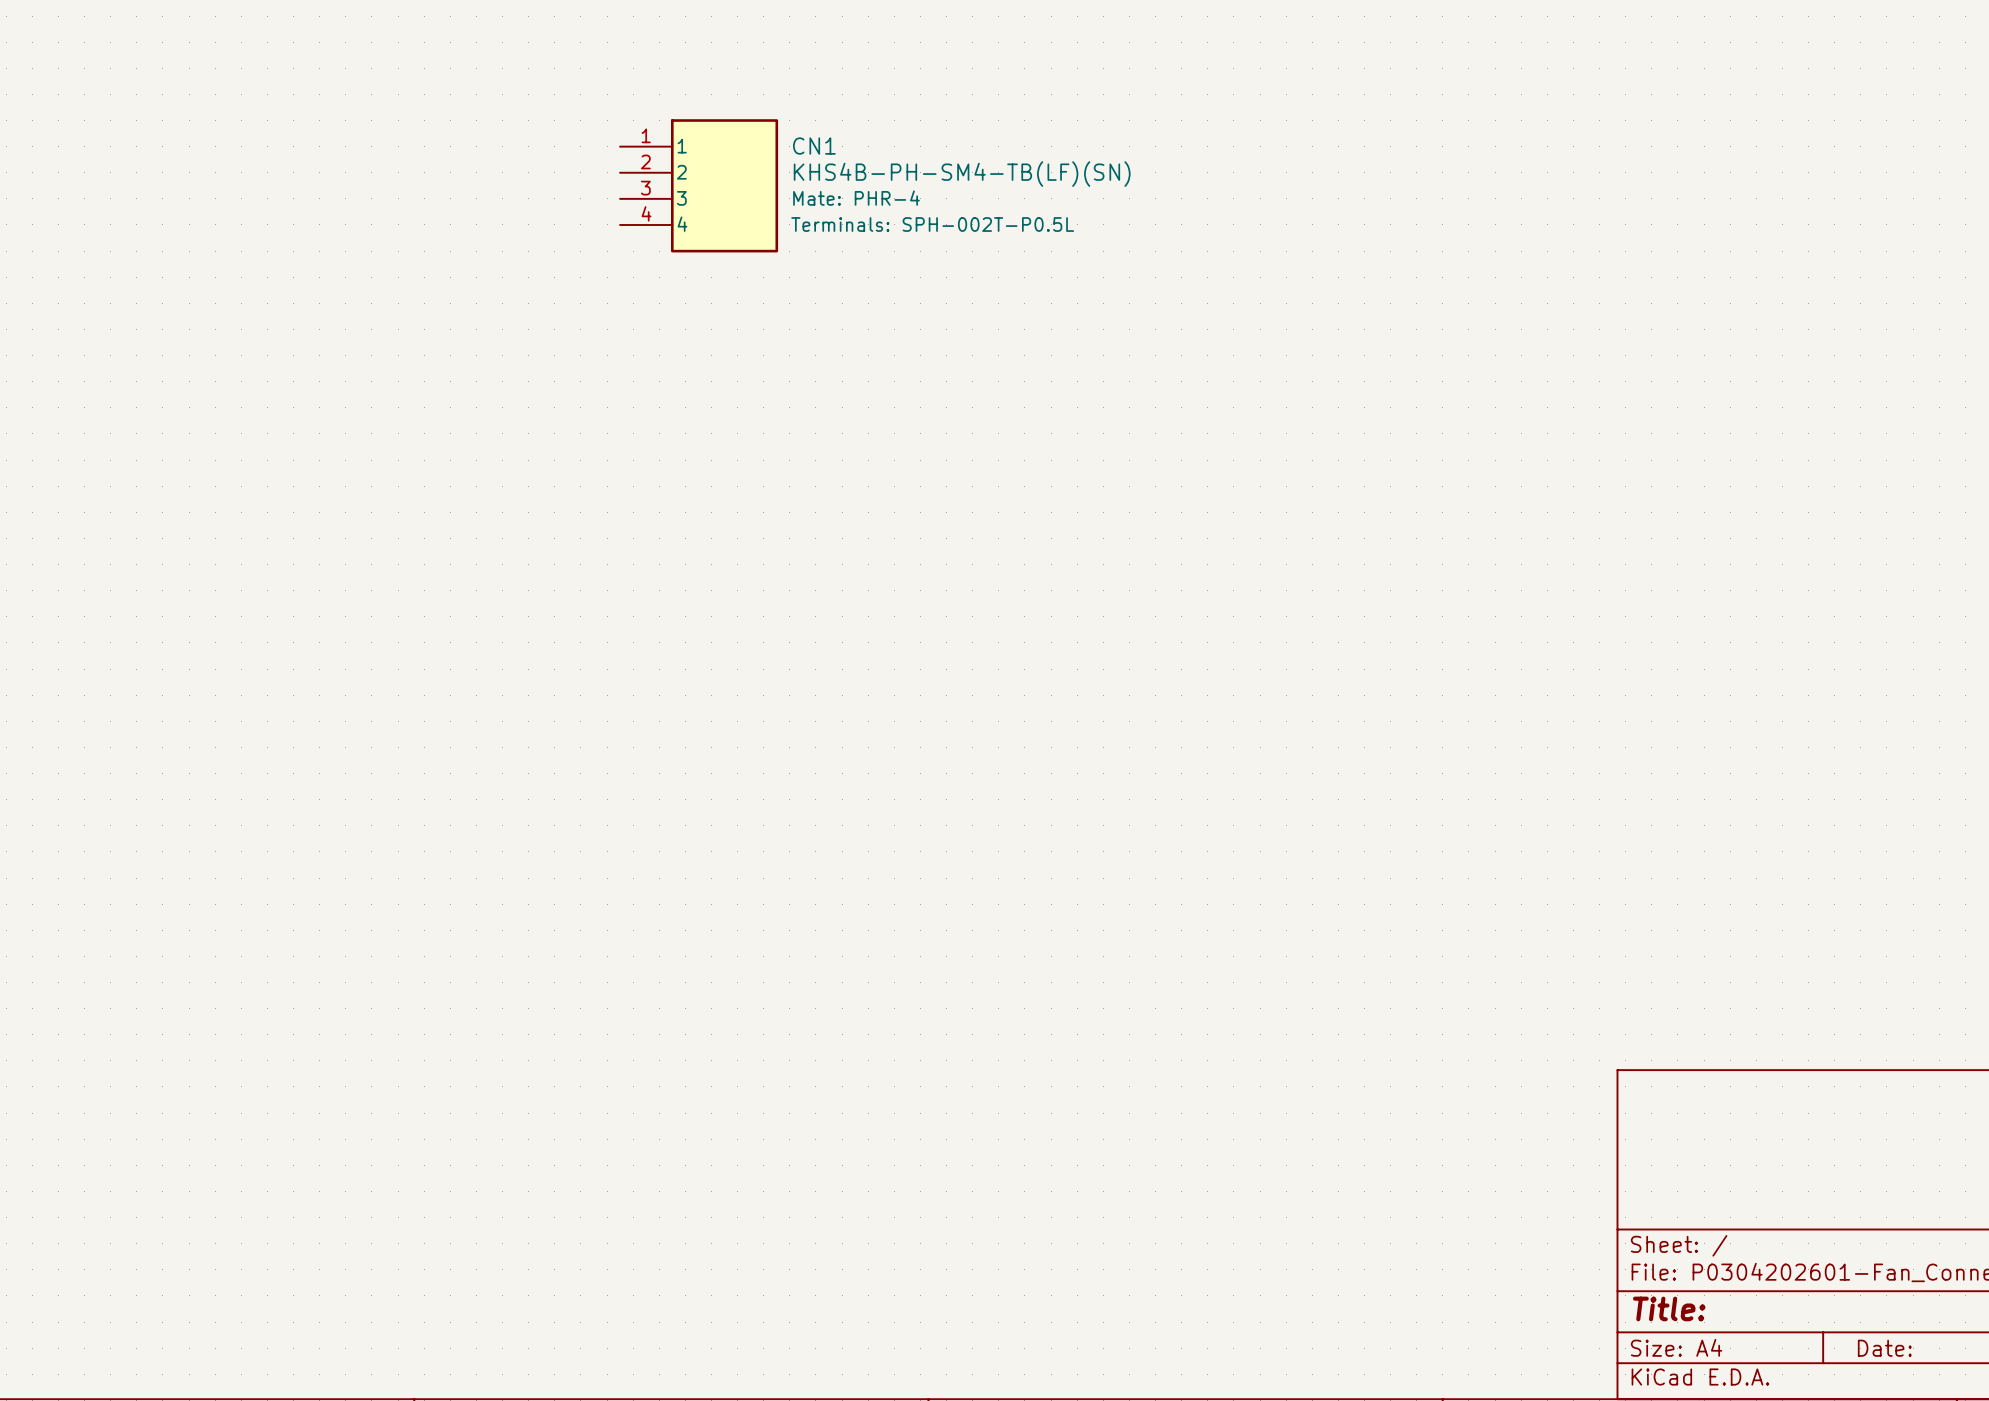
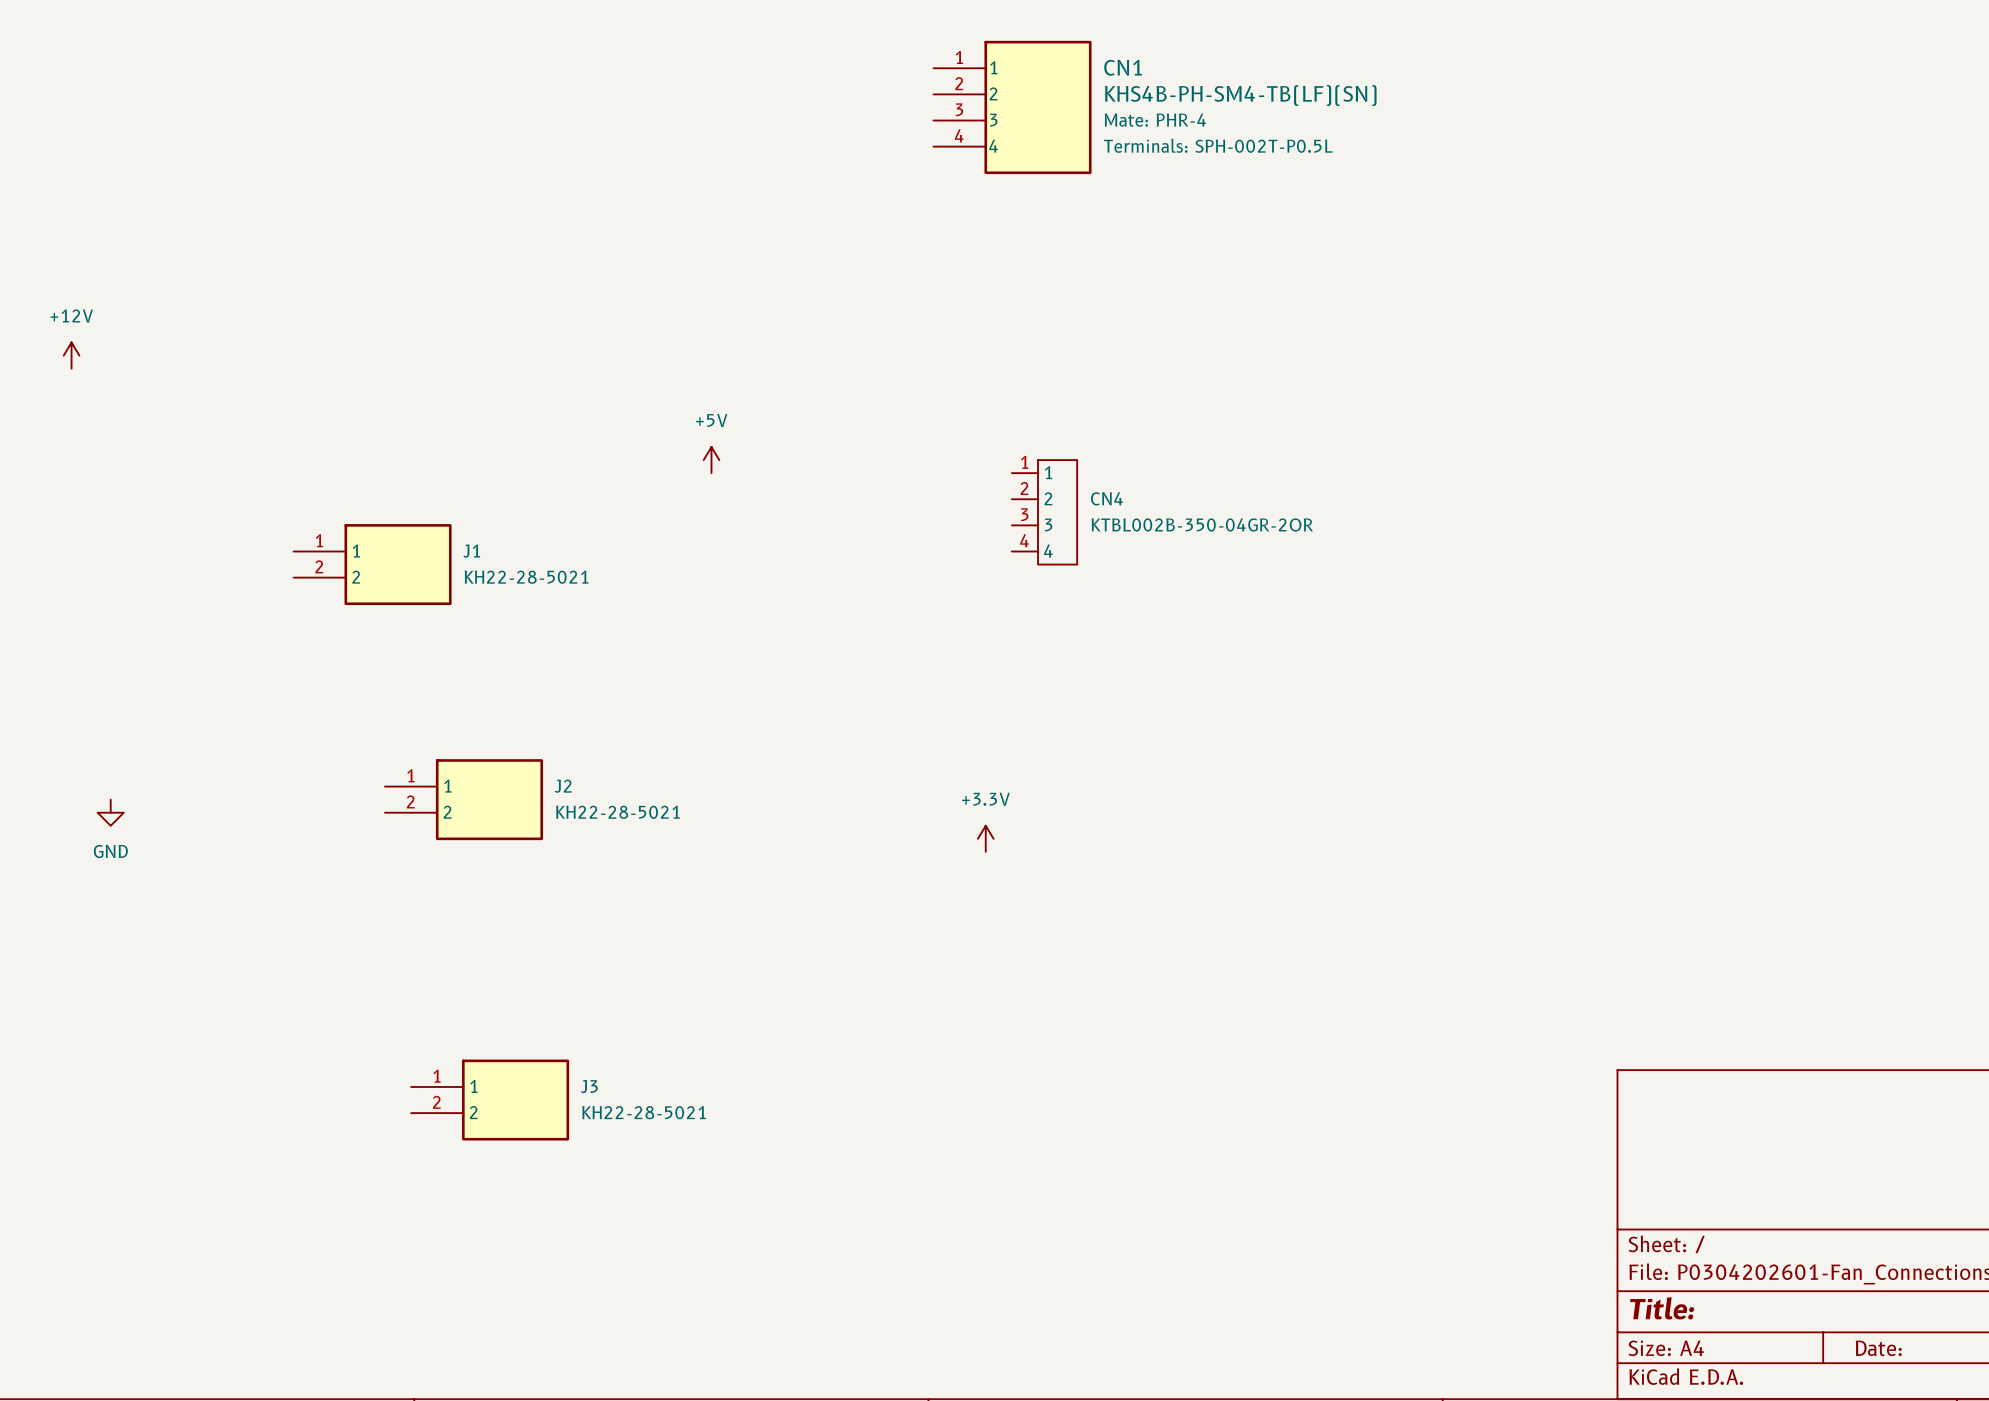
CN1 position: (699, 185) -> (1012, 107)
power symbol: none -> +12V (71, 355)
power symbol: none -> +5V (711, 460)
CN4: none -> KTBL002B-350-04GR-2OR (1044, 512)
J1: none -> KH22-28-5021 (372, 564)
J2: none -> KH22-28-5021 (464, 799)
power symbol: none -> GND (110, 812)
power symbol: none -> +3.3V (985, 838)
J3: none -> KH22-28-5021 (490, 1100)

